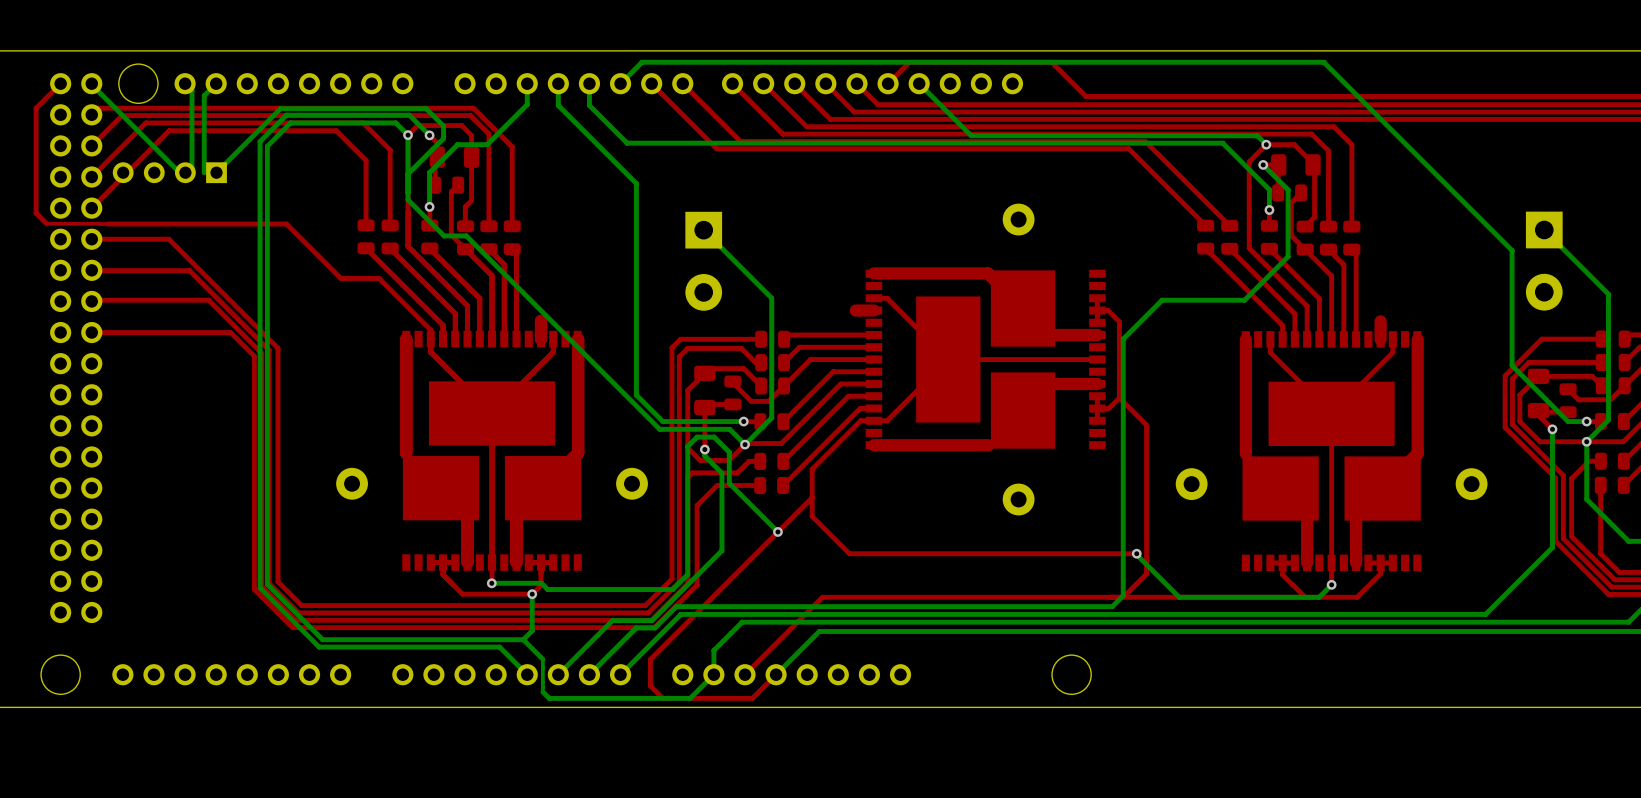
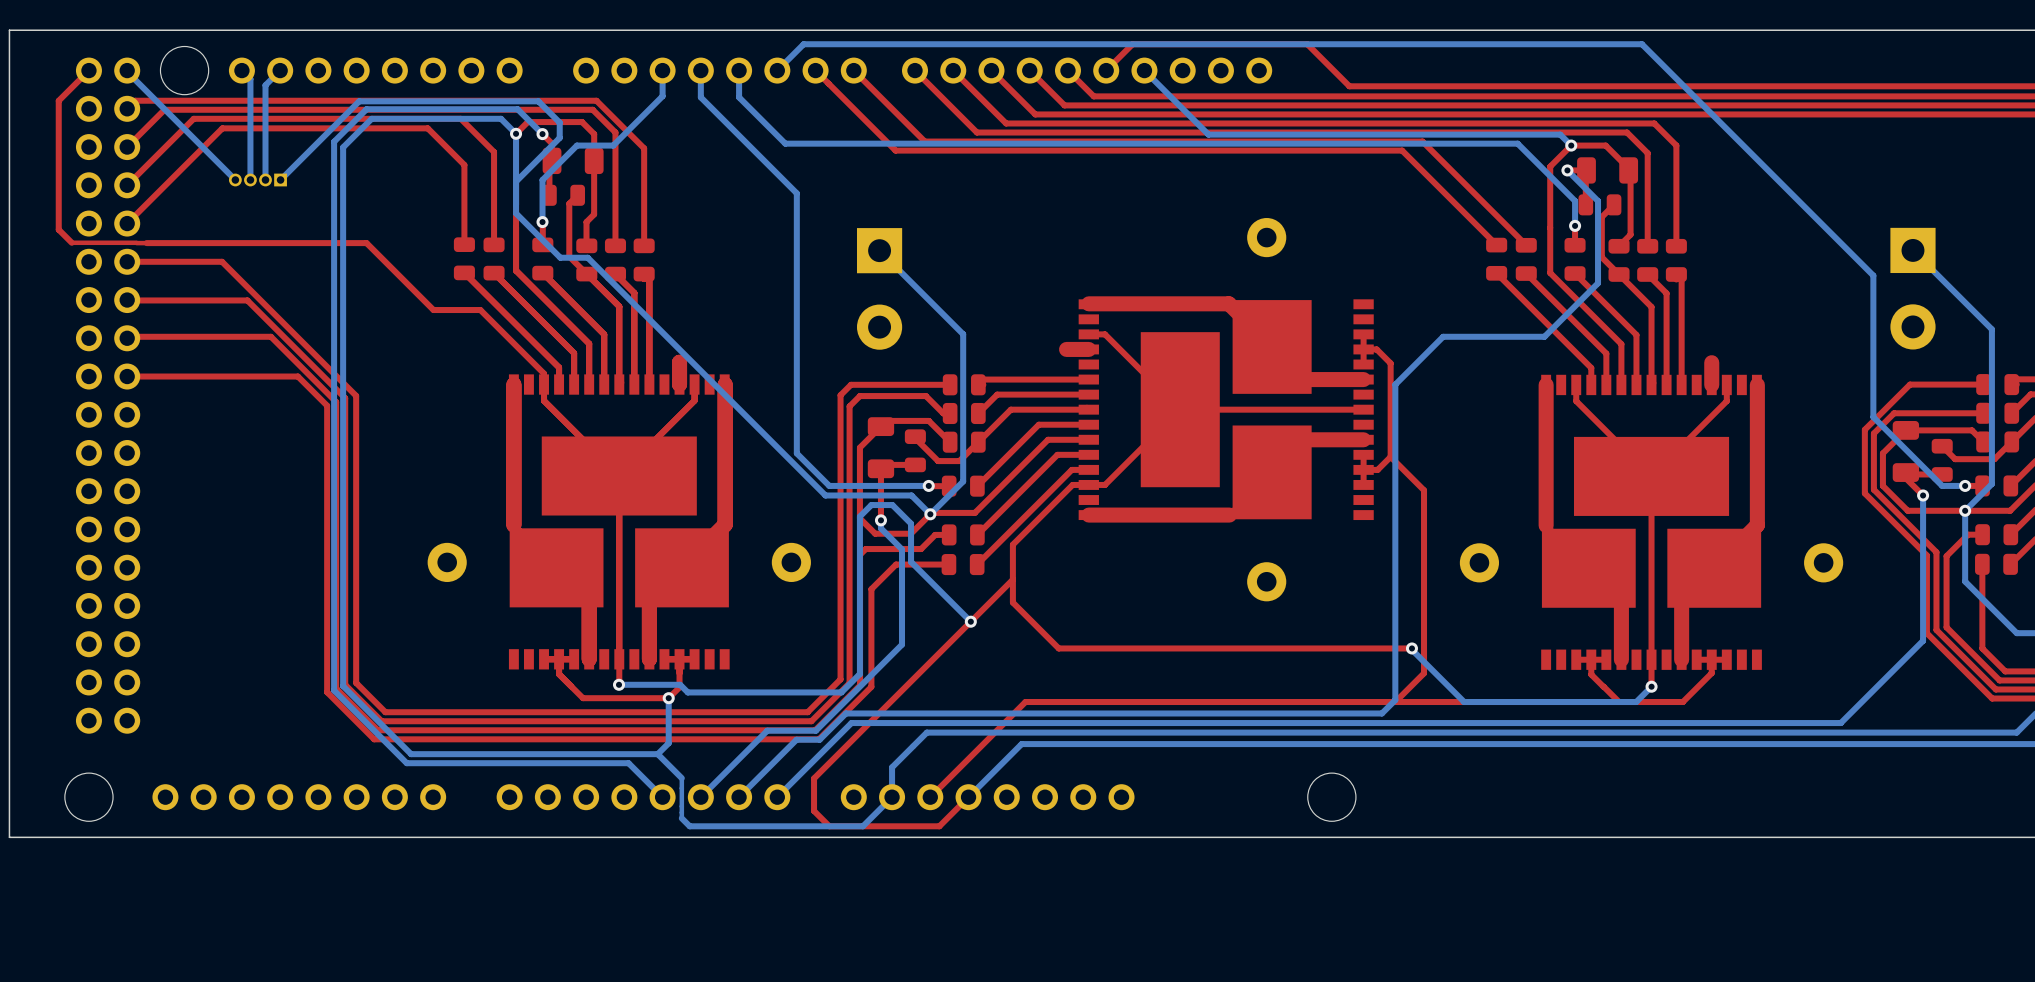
part: (169, 172) -> none
part: none -> (257, 179)

